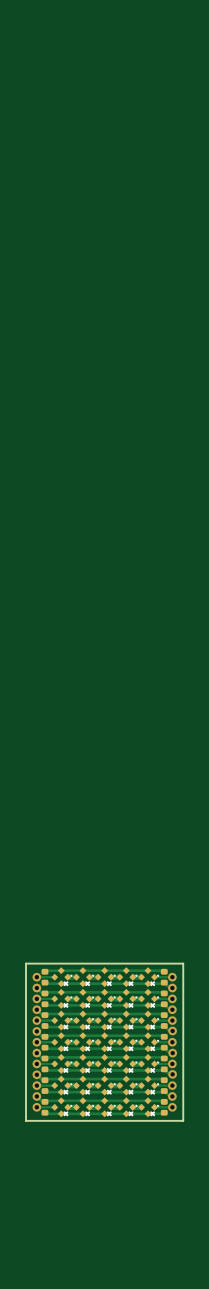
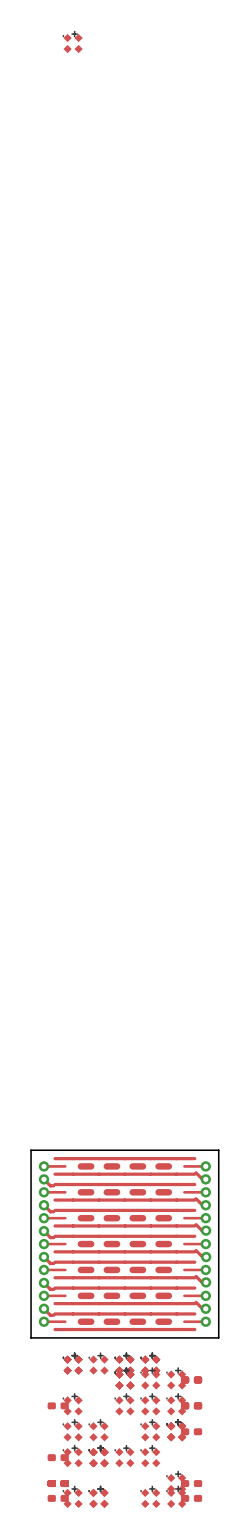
part: none -> (72, 41)
part: (44, 977) -> none
part: (61, 977) -> none
part: (83, 977) -> none
part: (105, 977) -> none
part: (126, 977) -> none
part: (148, 977) -> none
part: (164, 977) -> none
part: (44, 998) -> none
part: (61, 998) -> none
part: (83, 998) -> none
part: (105, 998) -> none
part: (126, 998) -> none
part: (148, 998) -> none
part: (164, 998) -> none
part: (44, 1020) -> none
part: (61, 1020) -> none
part: (83, 1020) -> none
part: (105, 1020) -> none
part: (126, 1020) -> none
part: (148, 1020) -> none
part: (164, 1020) -> none
part: (44, 1042) -> none
part: (61, 1042) -> none
part: (83, 1042) -> none
part: (105, 1042) -> none
part: (126, 1042) -> none
part: (148, 1042) -> none
part: (164, 1042) -> none
part: (44, 1063) -> none
part: (61, 1063) -> none
part: (83, 1063) -> none
part: (105, 1063) -> none
part: (126, 1063) -> none
part: (148, 1063) -> none
part: (164, 1063) -> none
part: (44, 1085) -> none
part: (61, 1085) -> none
part: (83, 1085) -> none
part: (105, 1085) -> none
part: (126, 1085) -> none
part: (148, 1085) -> none
part: (164, 1085) -> none
part: (44, 1107) -> none
part: (61, 1107) -> none
part: (83, 1107) -> none
part: (105, 1107) -> none
part: (126, 1107) -> none
part: (148, 1107) -> none
part: (164, 1107) -> none
part: none -> (72, 1363)
part: none -> (98, 1363)
part: none -> (124, 1363)
part: none -> (150, 1363)
part: none -> (124, 1378)
part: none -> (150, 1378)
part: none -> (176, 1378)
part: none -> (191, 1379)
part: none -> (72, 1404)
part: none -> (124, 1404)
part: none -> (150, 1404)
part: none -> (176, 1404)
part: none -> (58, 1405)
part: none -> (191, 1405)
part: none -> (72, 1430)
part: none -> (98, 1430)
part: none -> (150, 1430)
part: none -> (176, 1430)
part: none -> (191, 1431)
part: none -> (72, 1456)
part: none -> (98, 1456)
part: none -> (124, 1456)
part: none -> (150, 1456)
part: none -> (58, 1457)
part: none -> (176, 1481)
part: none -> (58, 1483)
part: none -> (191, 1483)
part: none -> (72, 1496)
part: none -> (98, 1496)
part: none -> (150, 1496)
part: none -> (176, 1496)
part: none -> (58, 1498)
part: none -> (191, 1498)

